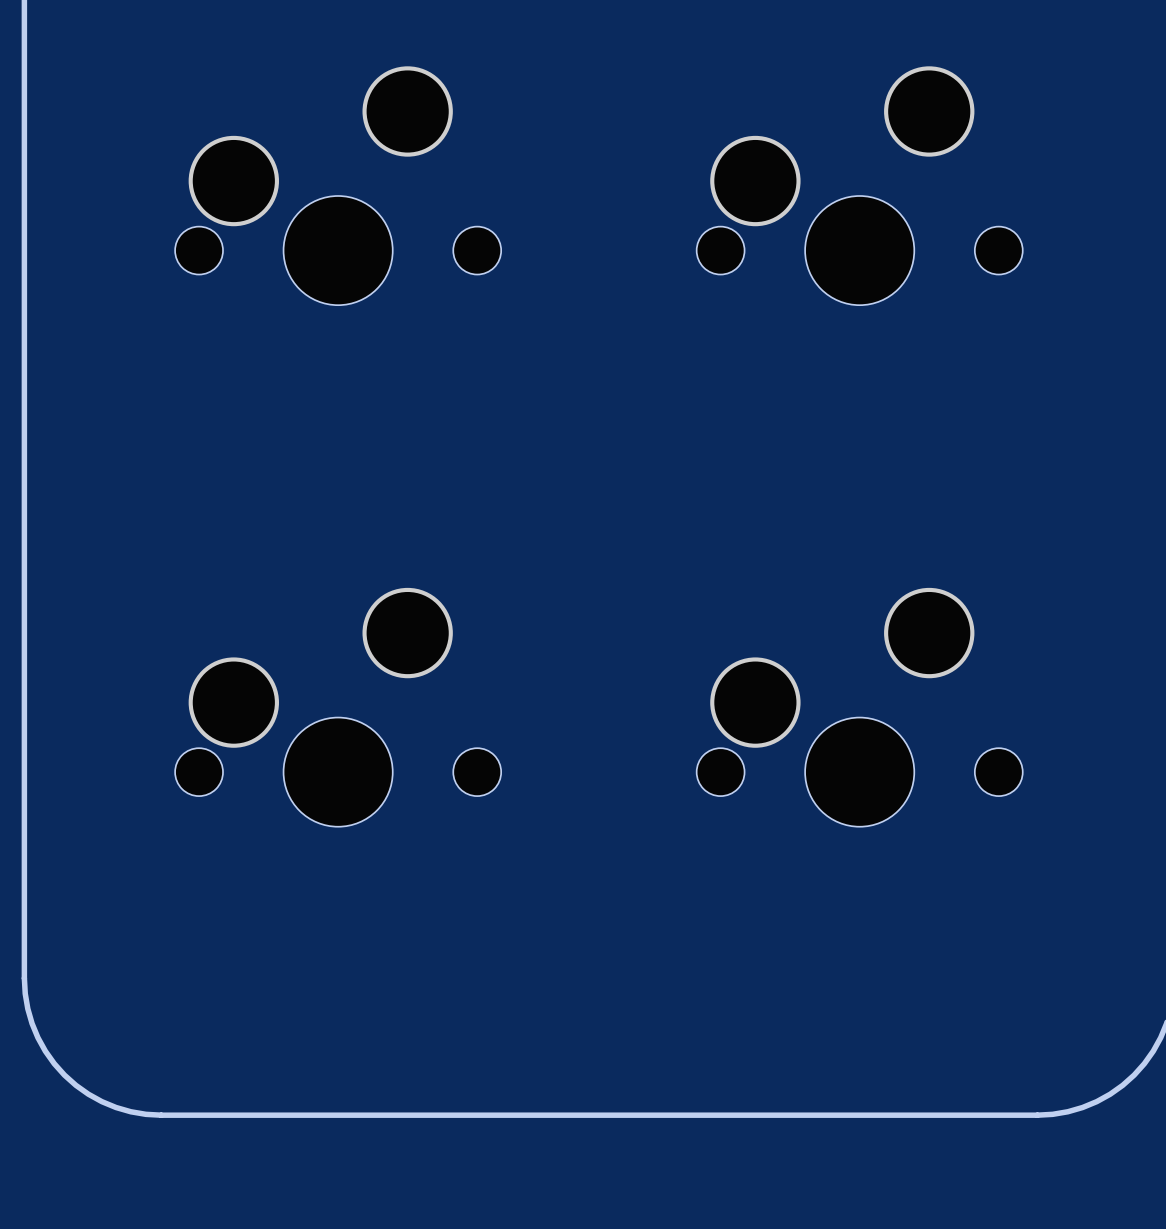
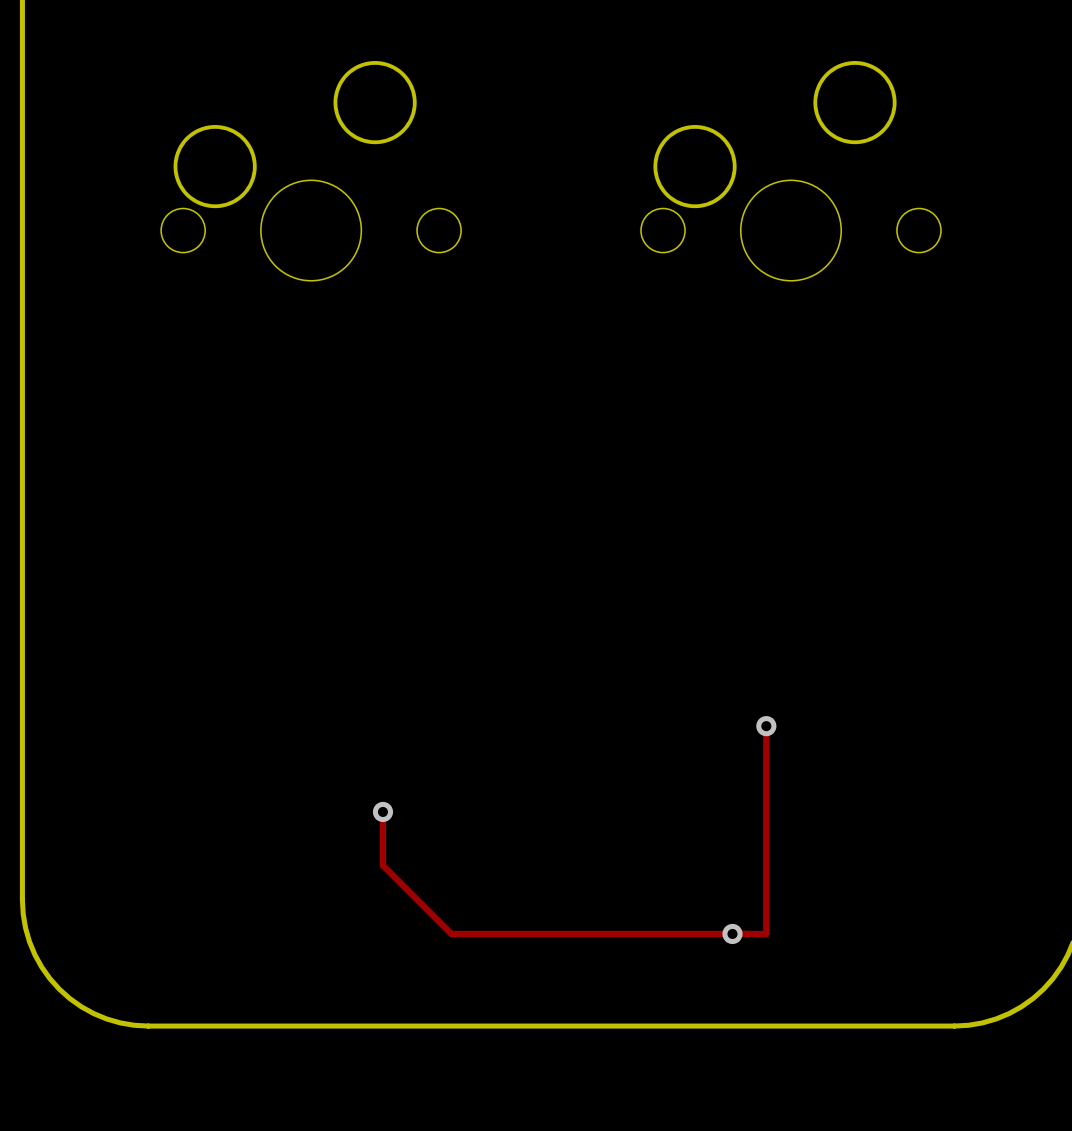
part: (338, 707) -> none
part: (859, 707) -> none
track: none -> (766, 726) (766, 933) (451, 933) (382, 865) (382, 811)
via: none -> (766, 726)
via: none -> (382, 811)
via: none -> (732, 933)

